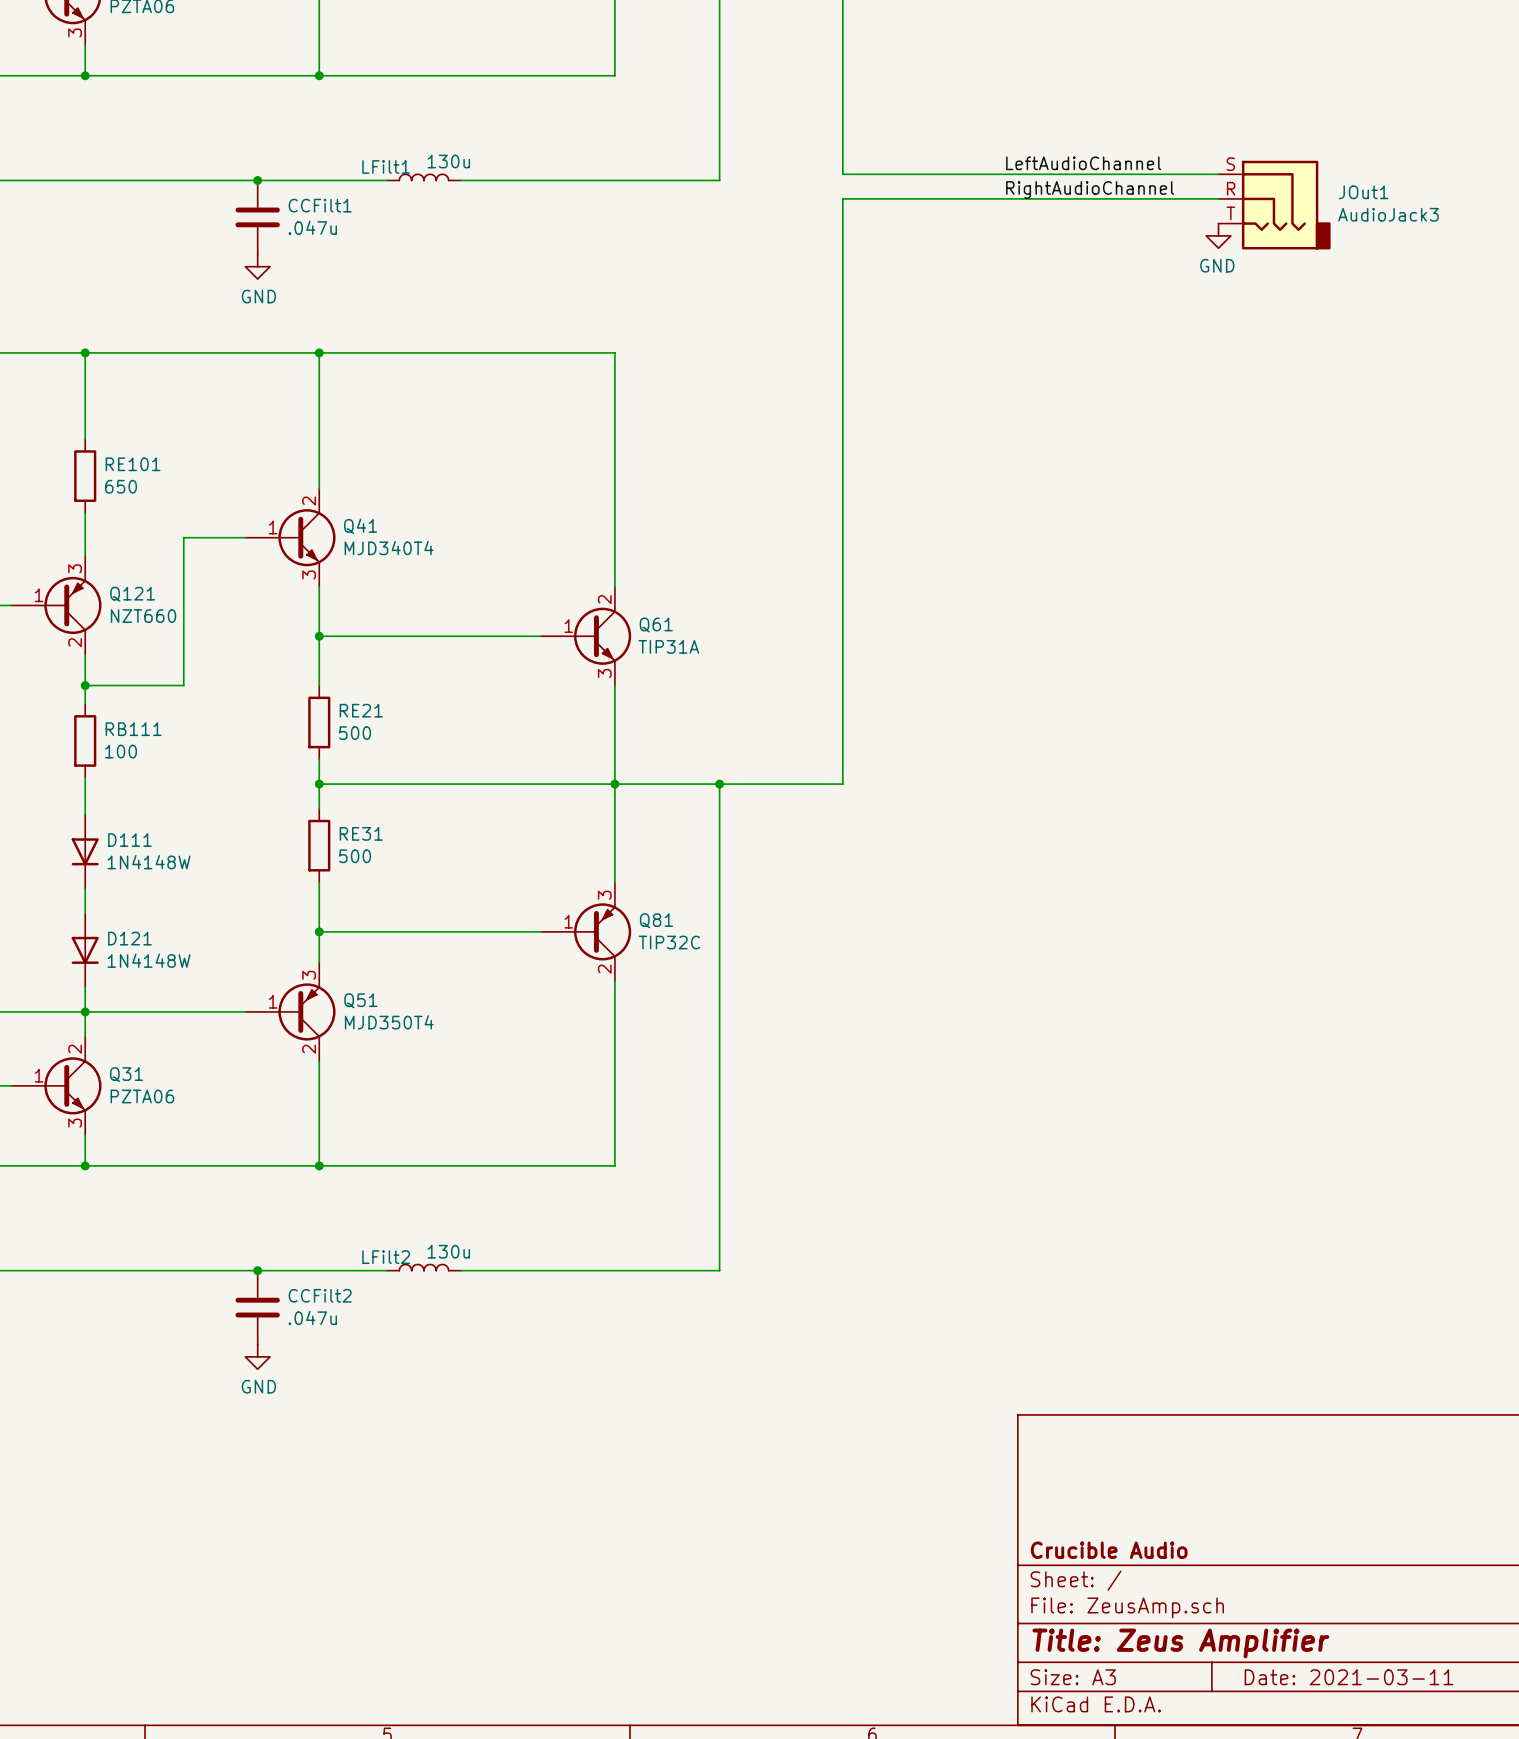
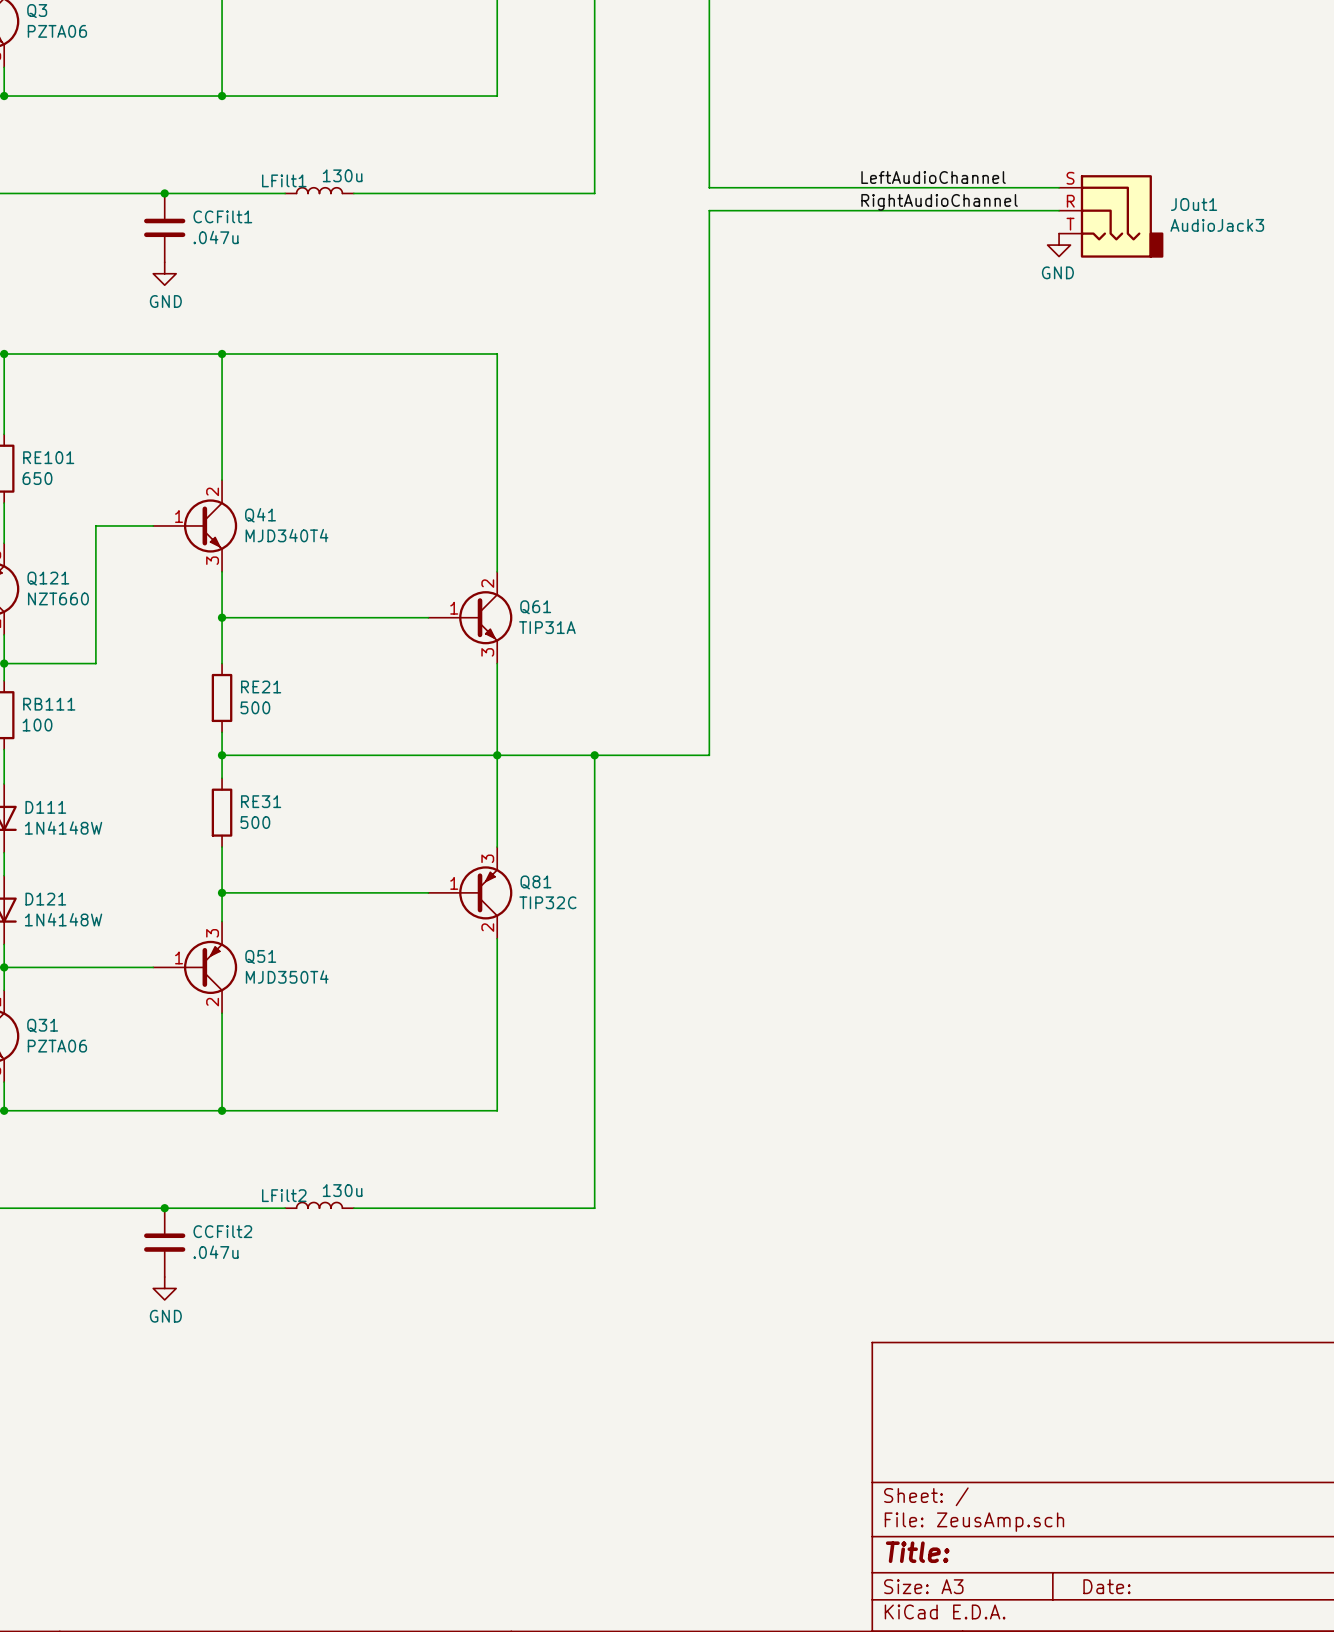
title block: Crucible Audio (1109, 1550) -> none
title block: Title: Zeus Amplifier (1180, 1643) -> Title: (917, 1552)
title block: Date: 2021-03-11 (1348, 1677) -> Date: (1106, 1586)

